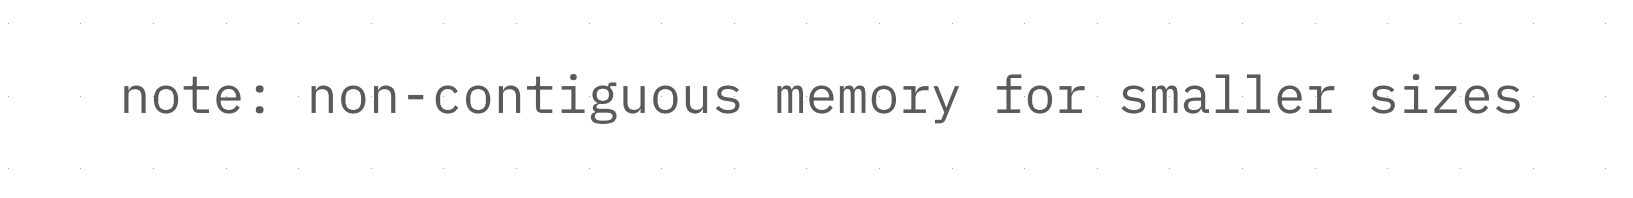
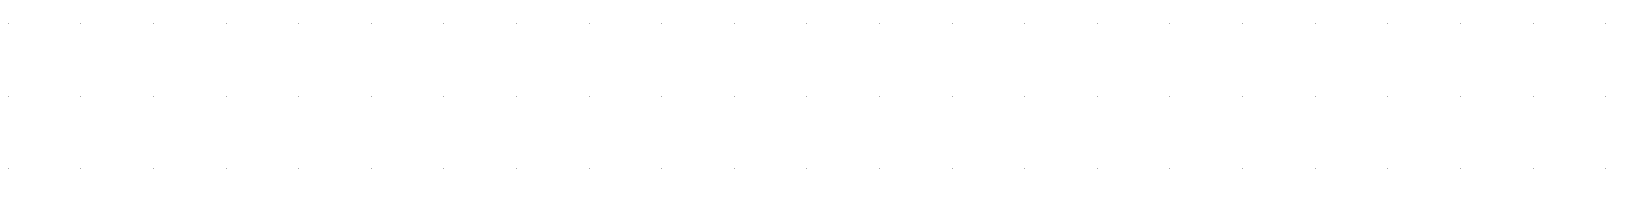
text: note: non-contiguous memory for smaller sizes (822, 99) -> none

